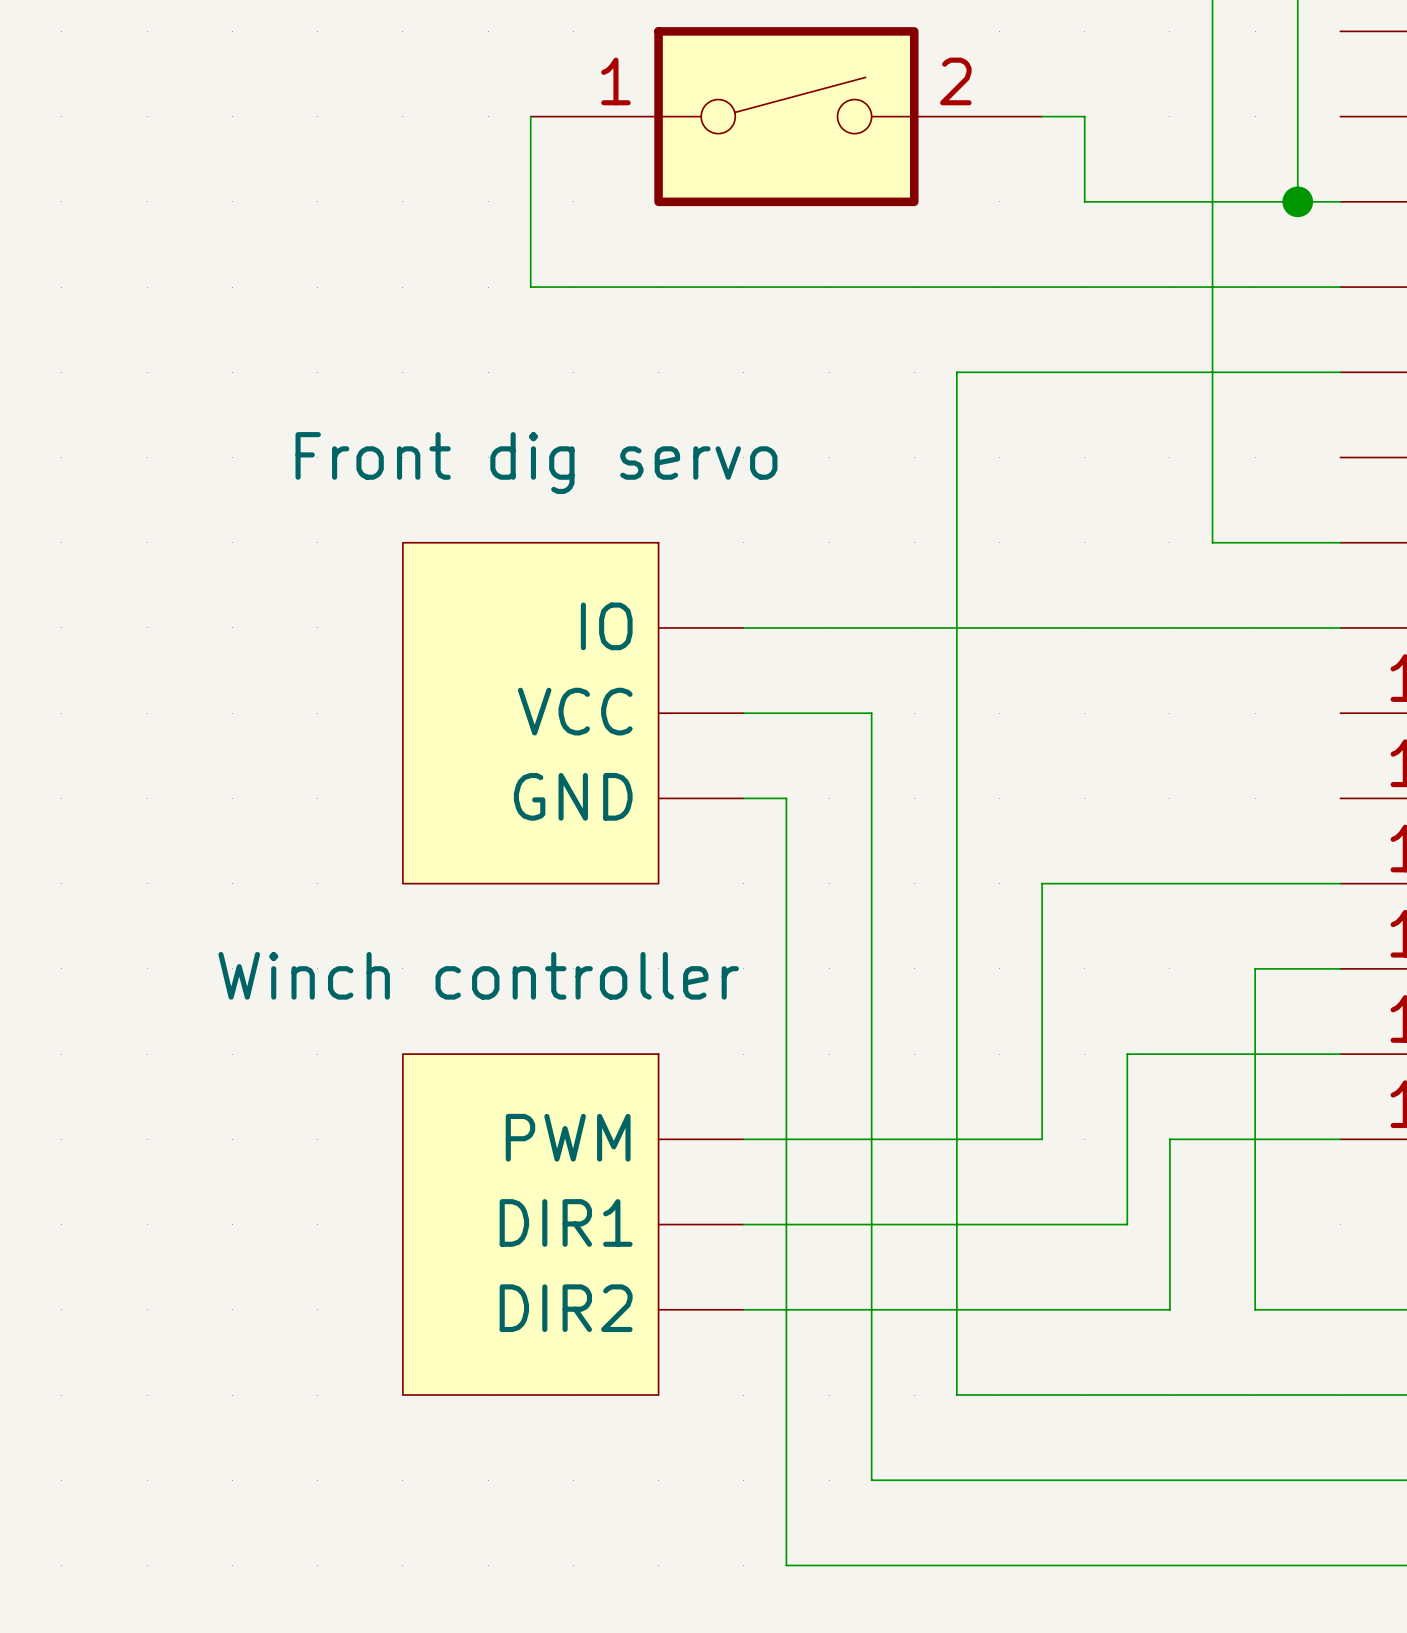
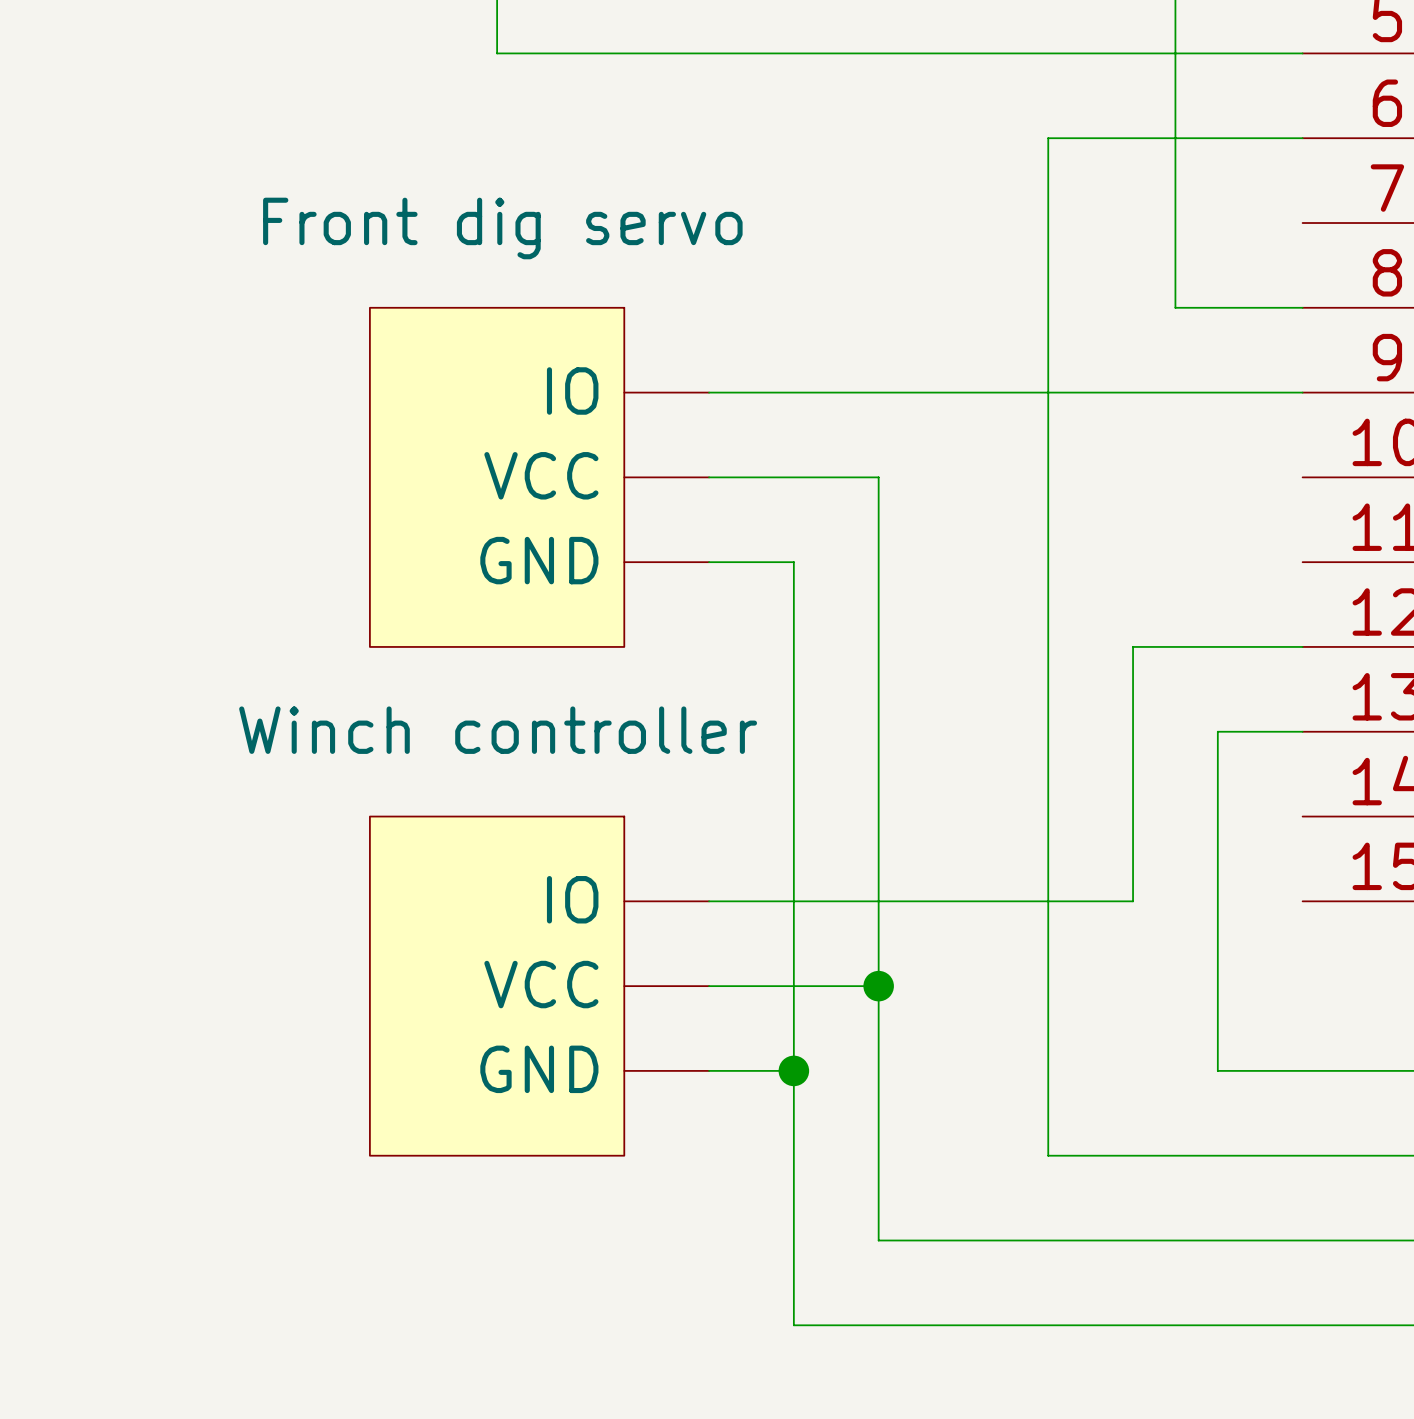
wire: (1084, 372) (956, 372) (956, 1395) (1084, 1395) -> (1048, 138) (1048, 1155)
wire: (871, 713) (871, 1480) (914, 1480) -> (836, 477) (878, 477) (878, 1240)
wire: (786, 798) (786, 1565) (829, 1565) -> (751, 562) (793, 562) (793, 1325)
wire: (1169, 883) (1042, 883) (1042, 1139) -> (1133, 646) (1133, 901) (1005, 901)
part value position: Winch controller (478, 975) -> Winch controller (498, 730)
wire: (1340, 1054) (1127, 1054) (1127, 1224) (914, 1224) -> none
part pin name: PWM (568, 1137) -> IO (572, 899)
wire: (1340, 1139) (1169, 1139) (1169, 1309) (829, 1309) -> none
part pin name: DIR1 (566, 1222) -> VCC (541, 984)
junction: none -> (878, 986)
part pin name: DIR2 (566, 1308) -> GND (539, 1069)
junction: none -> (793, 1070)

